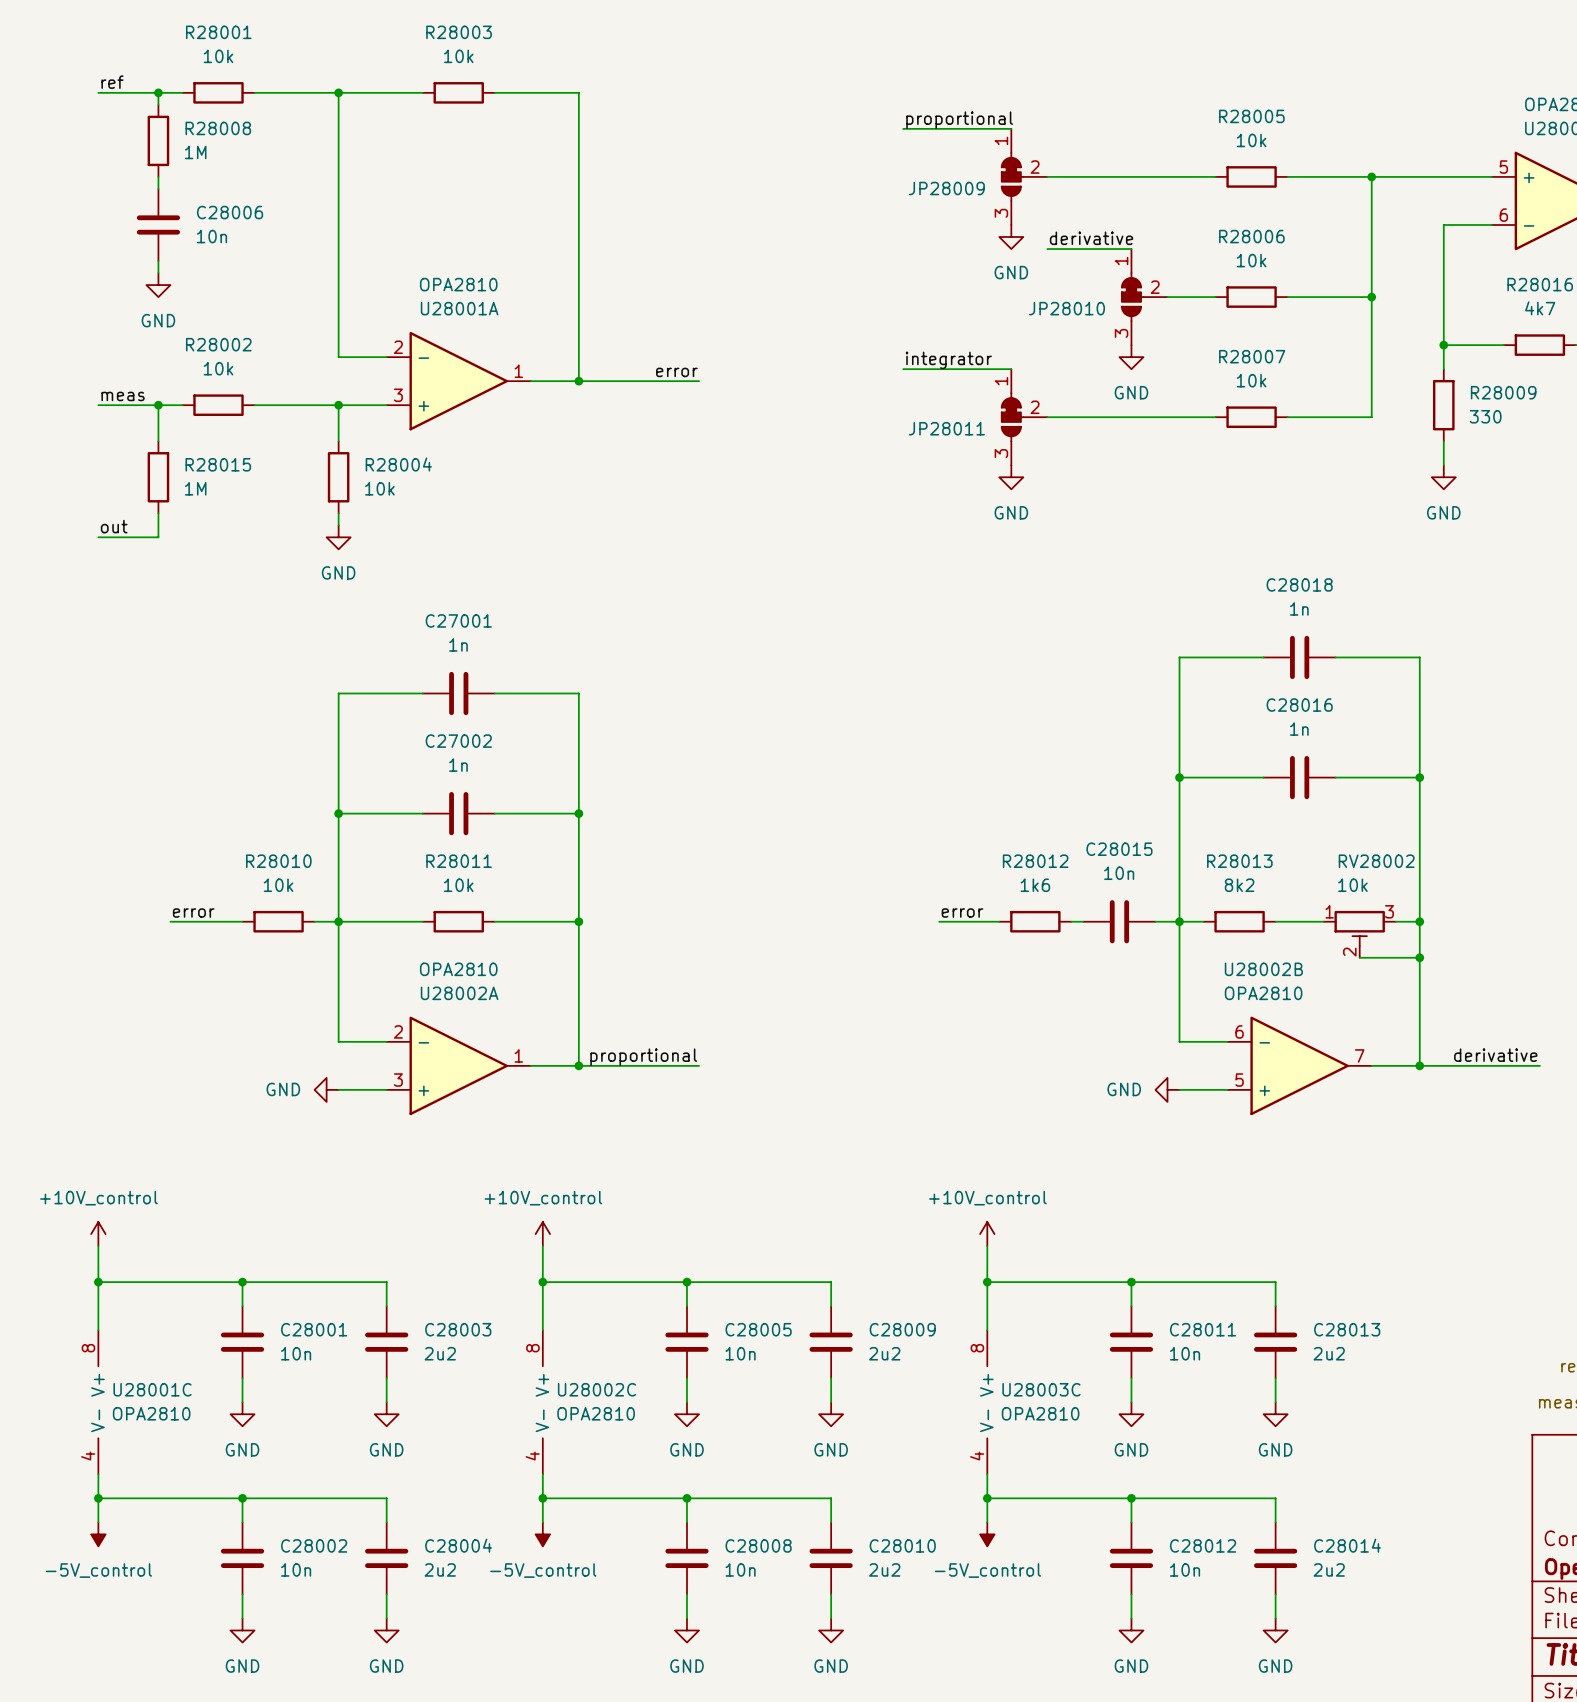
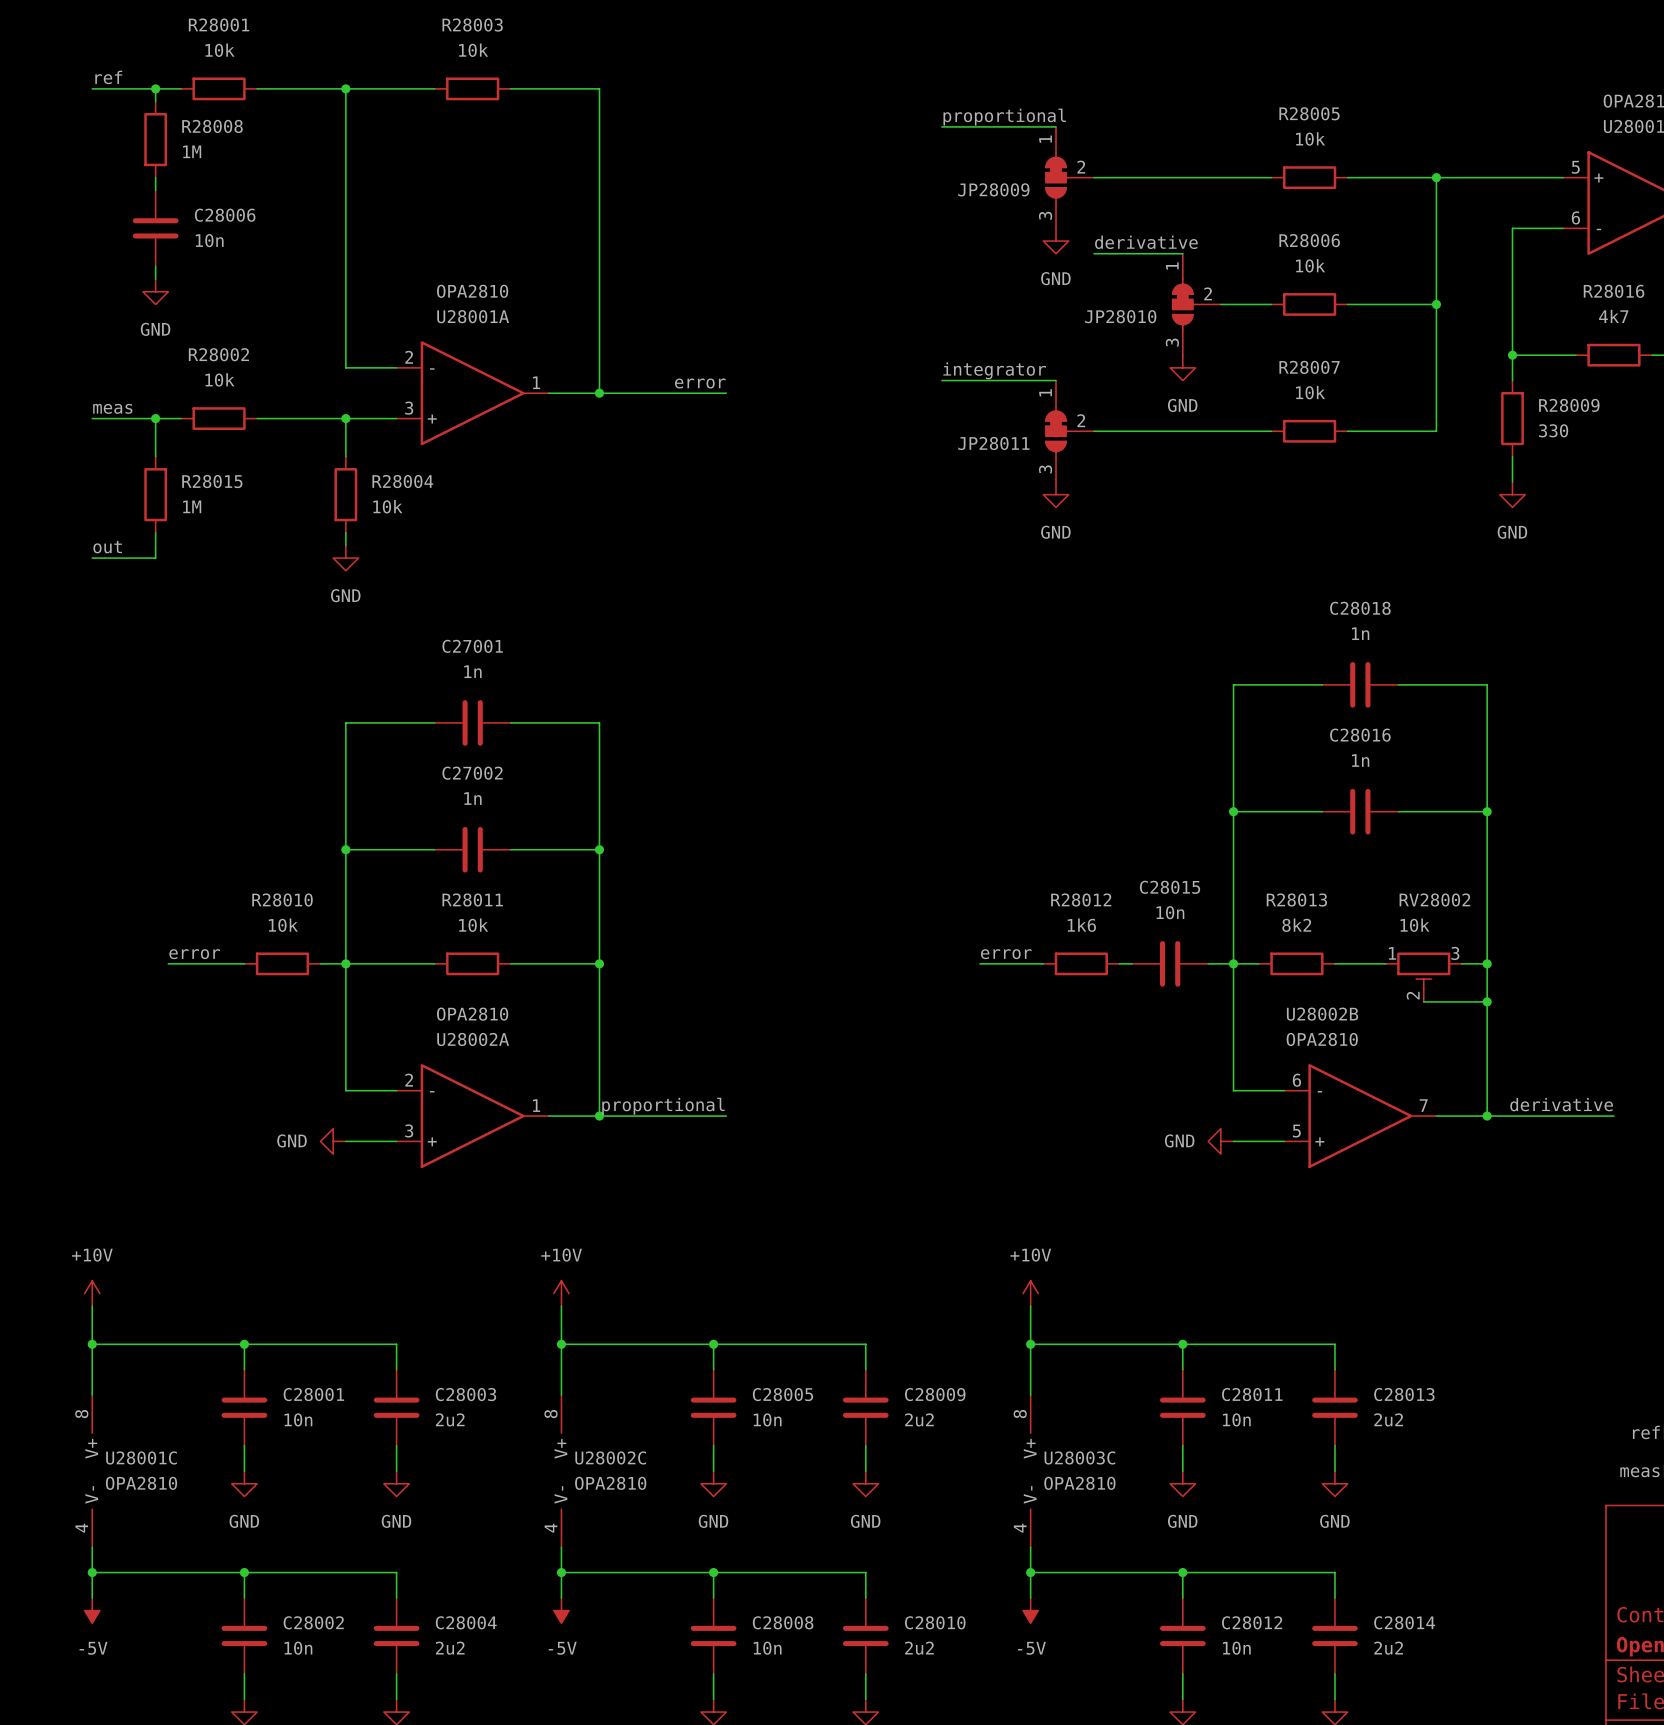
power symbol: +10V_control (98, 1234) -> +10V (92, 1293)
power symbol: +10V_control (542, 1234) -> +10V (561, 1293)
power symbol: +10V_control (987, 1234) -> +10V (1030, 1293)
power symbol: -5V_control (98, 1534) -> -5V (92, 1610)
power symbol: -5V_control (542, 1534) -> -5V (561, 1610)
power symbol: -5V_control (987, 1534) -> -5V (1030, 1610)

